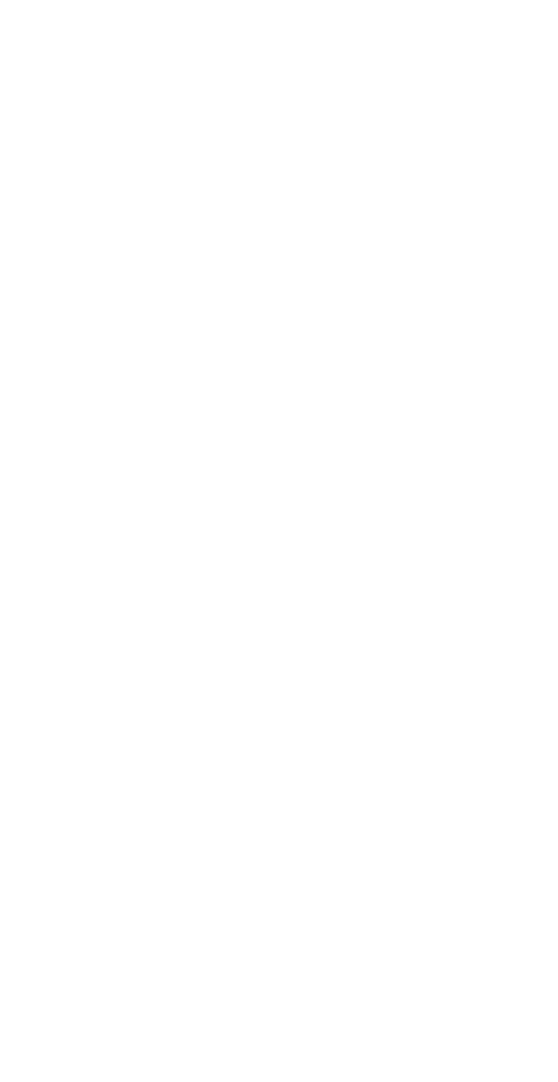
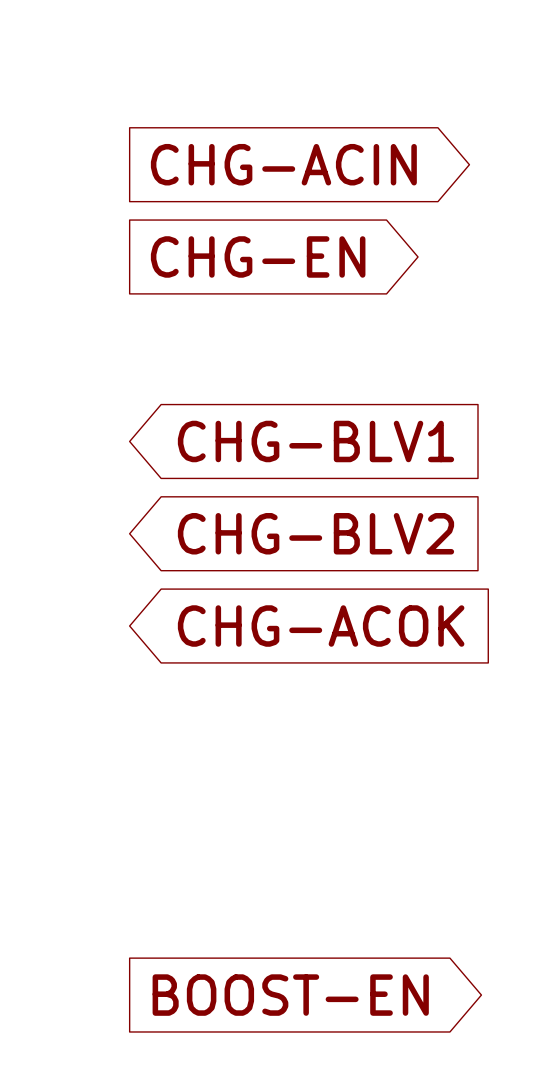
global label: none -> CHG-ACIN (283, 164)
global label: none -> CHG-EN (258, 256)
global label: none -> CHG-BLV1 (315, 441)
global label: none -> CHG-BLV2 (315, 533)
global label: none -> CHG-ACOK (321, 626)
global label: none -> BOOST-EN (290, 995)

